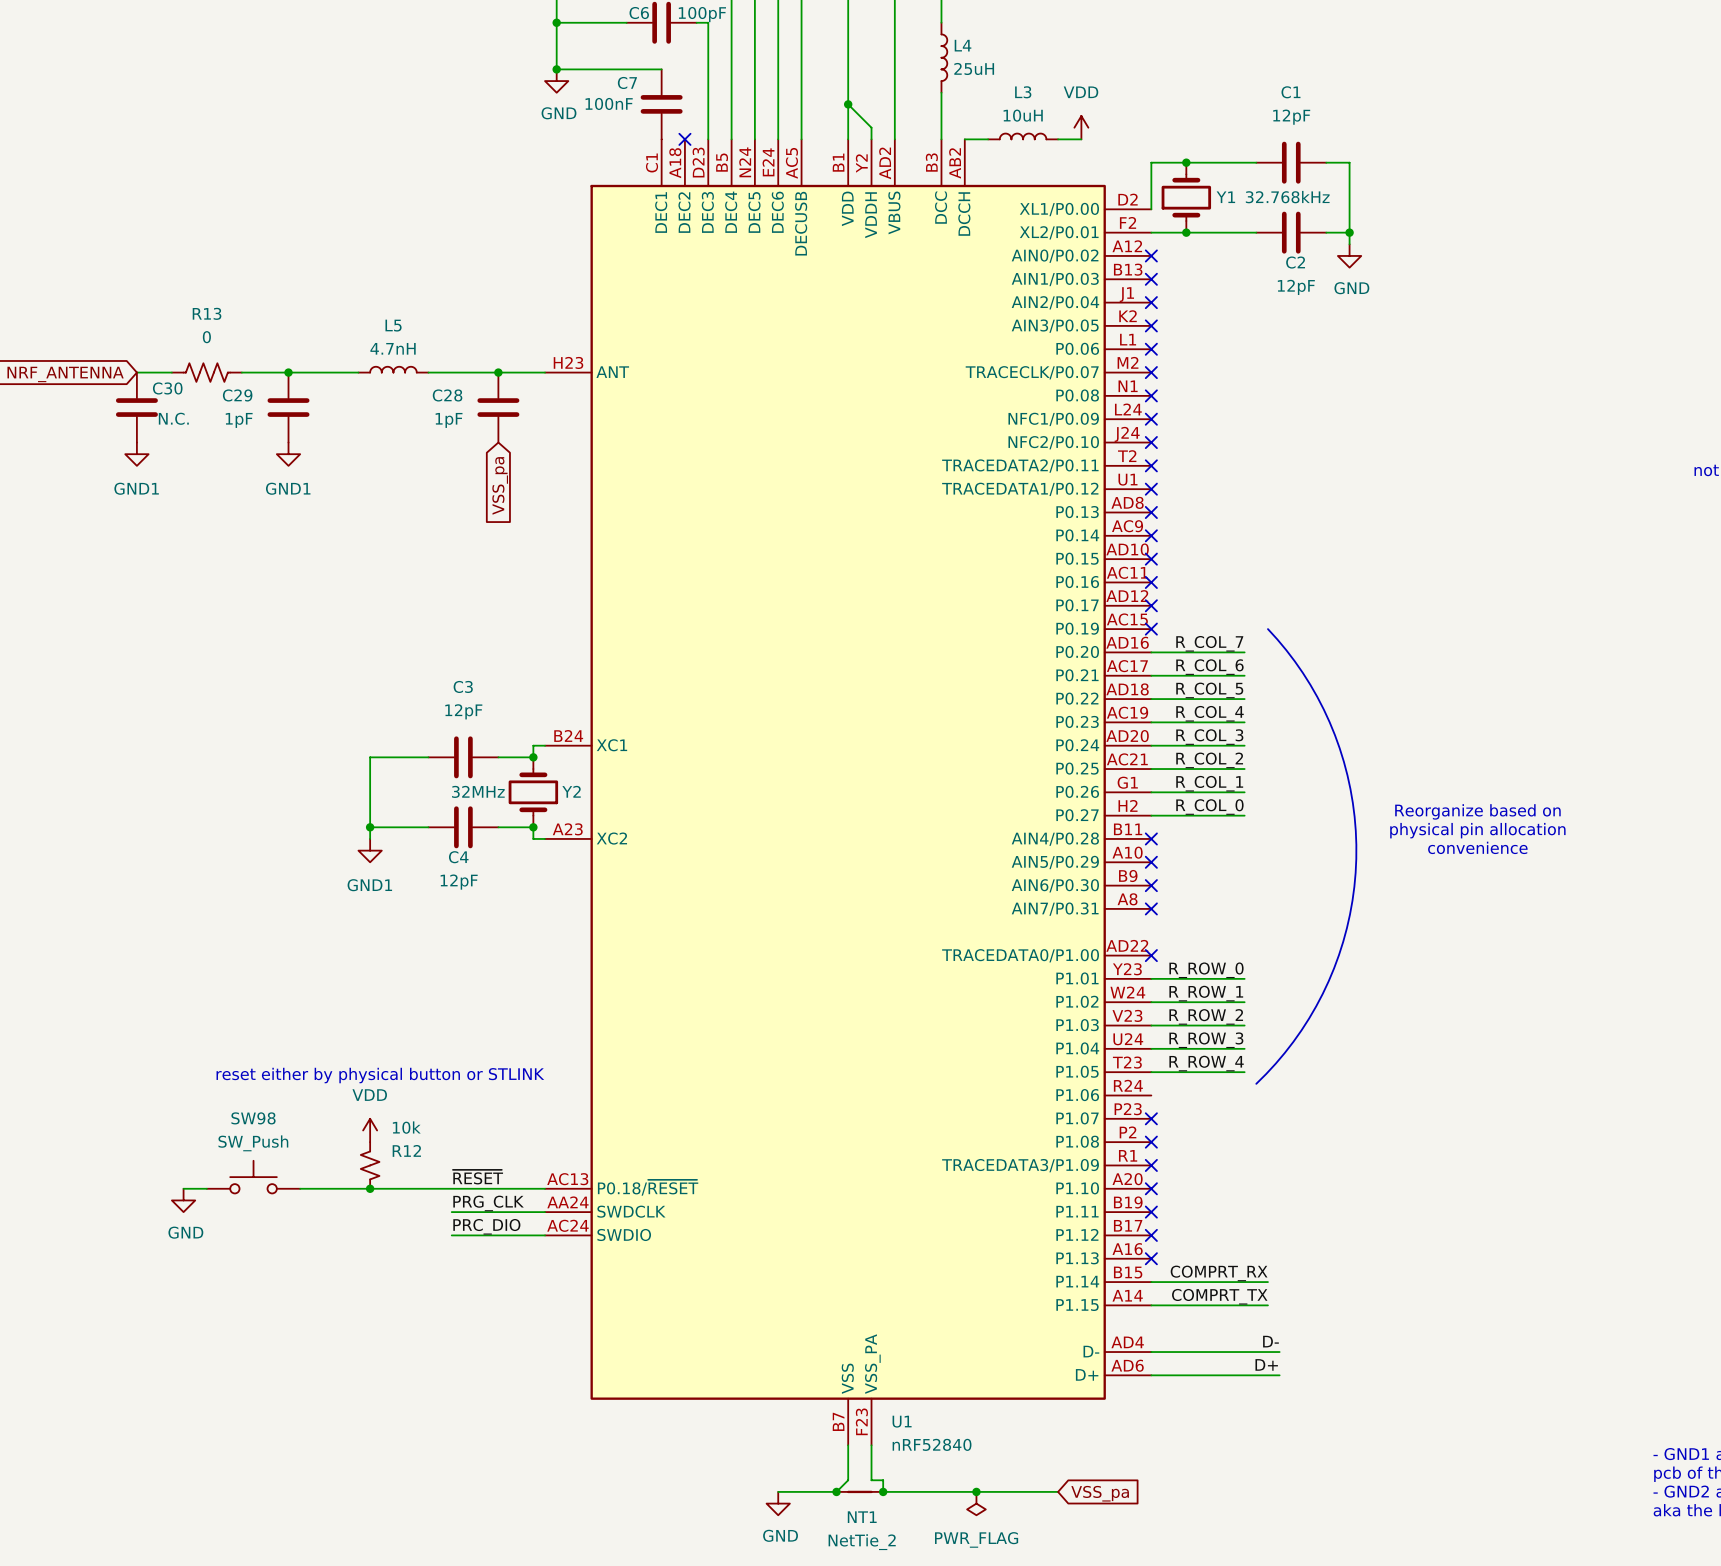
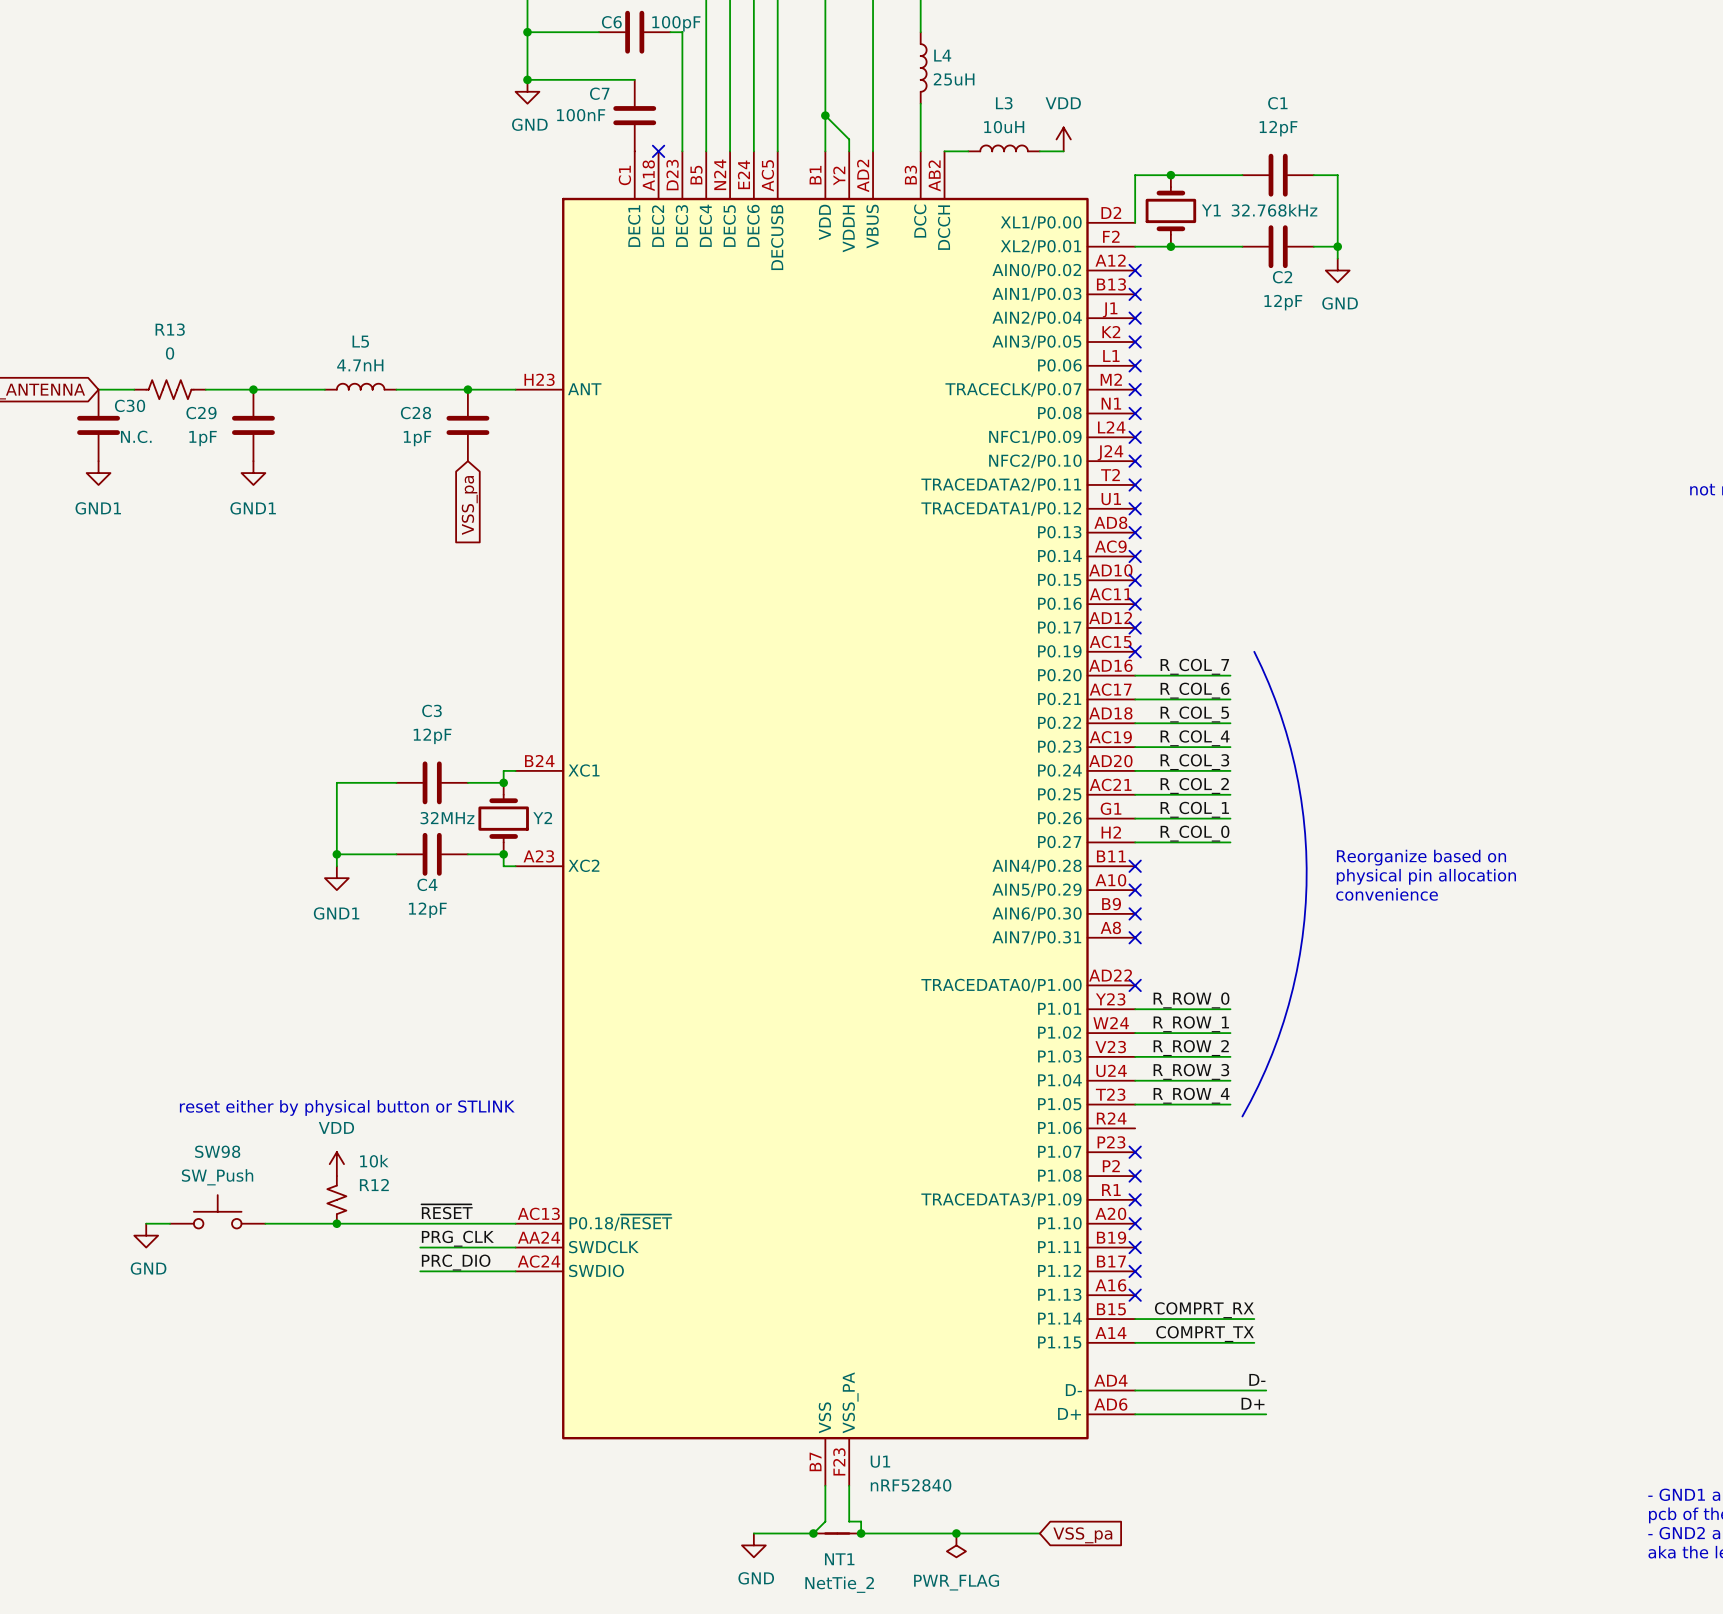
line: (1267, 629) (1286, 650) (1310, 684) (1334, 735) (1350, 789) (1355, 830) (1356, 858) (1354, 886) (1346, 928) (1328, 981) (1301, 1030) (1284, 1052) (1256, 1083) -> (1254, 651) (1275, 699) (1294, 765) (1303, 816) (1306, 885) (1302, 937) (1288, 1005) (1272, 1054) (1242, 1116)
text position: Reorganize based on (1477, 811) -> Reorganize based on (1421, 857)
text position: physical pin allocation (1477, 830) -> physical pin allocation (1426, 876)
text position: convenience (1477, 847) -> convenience (1387, 894)

